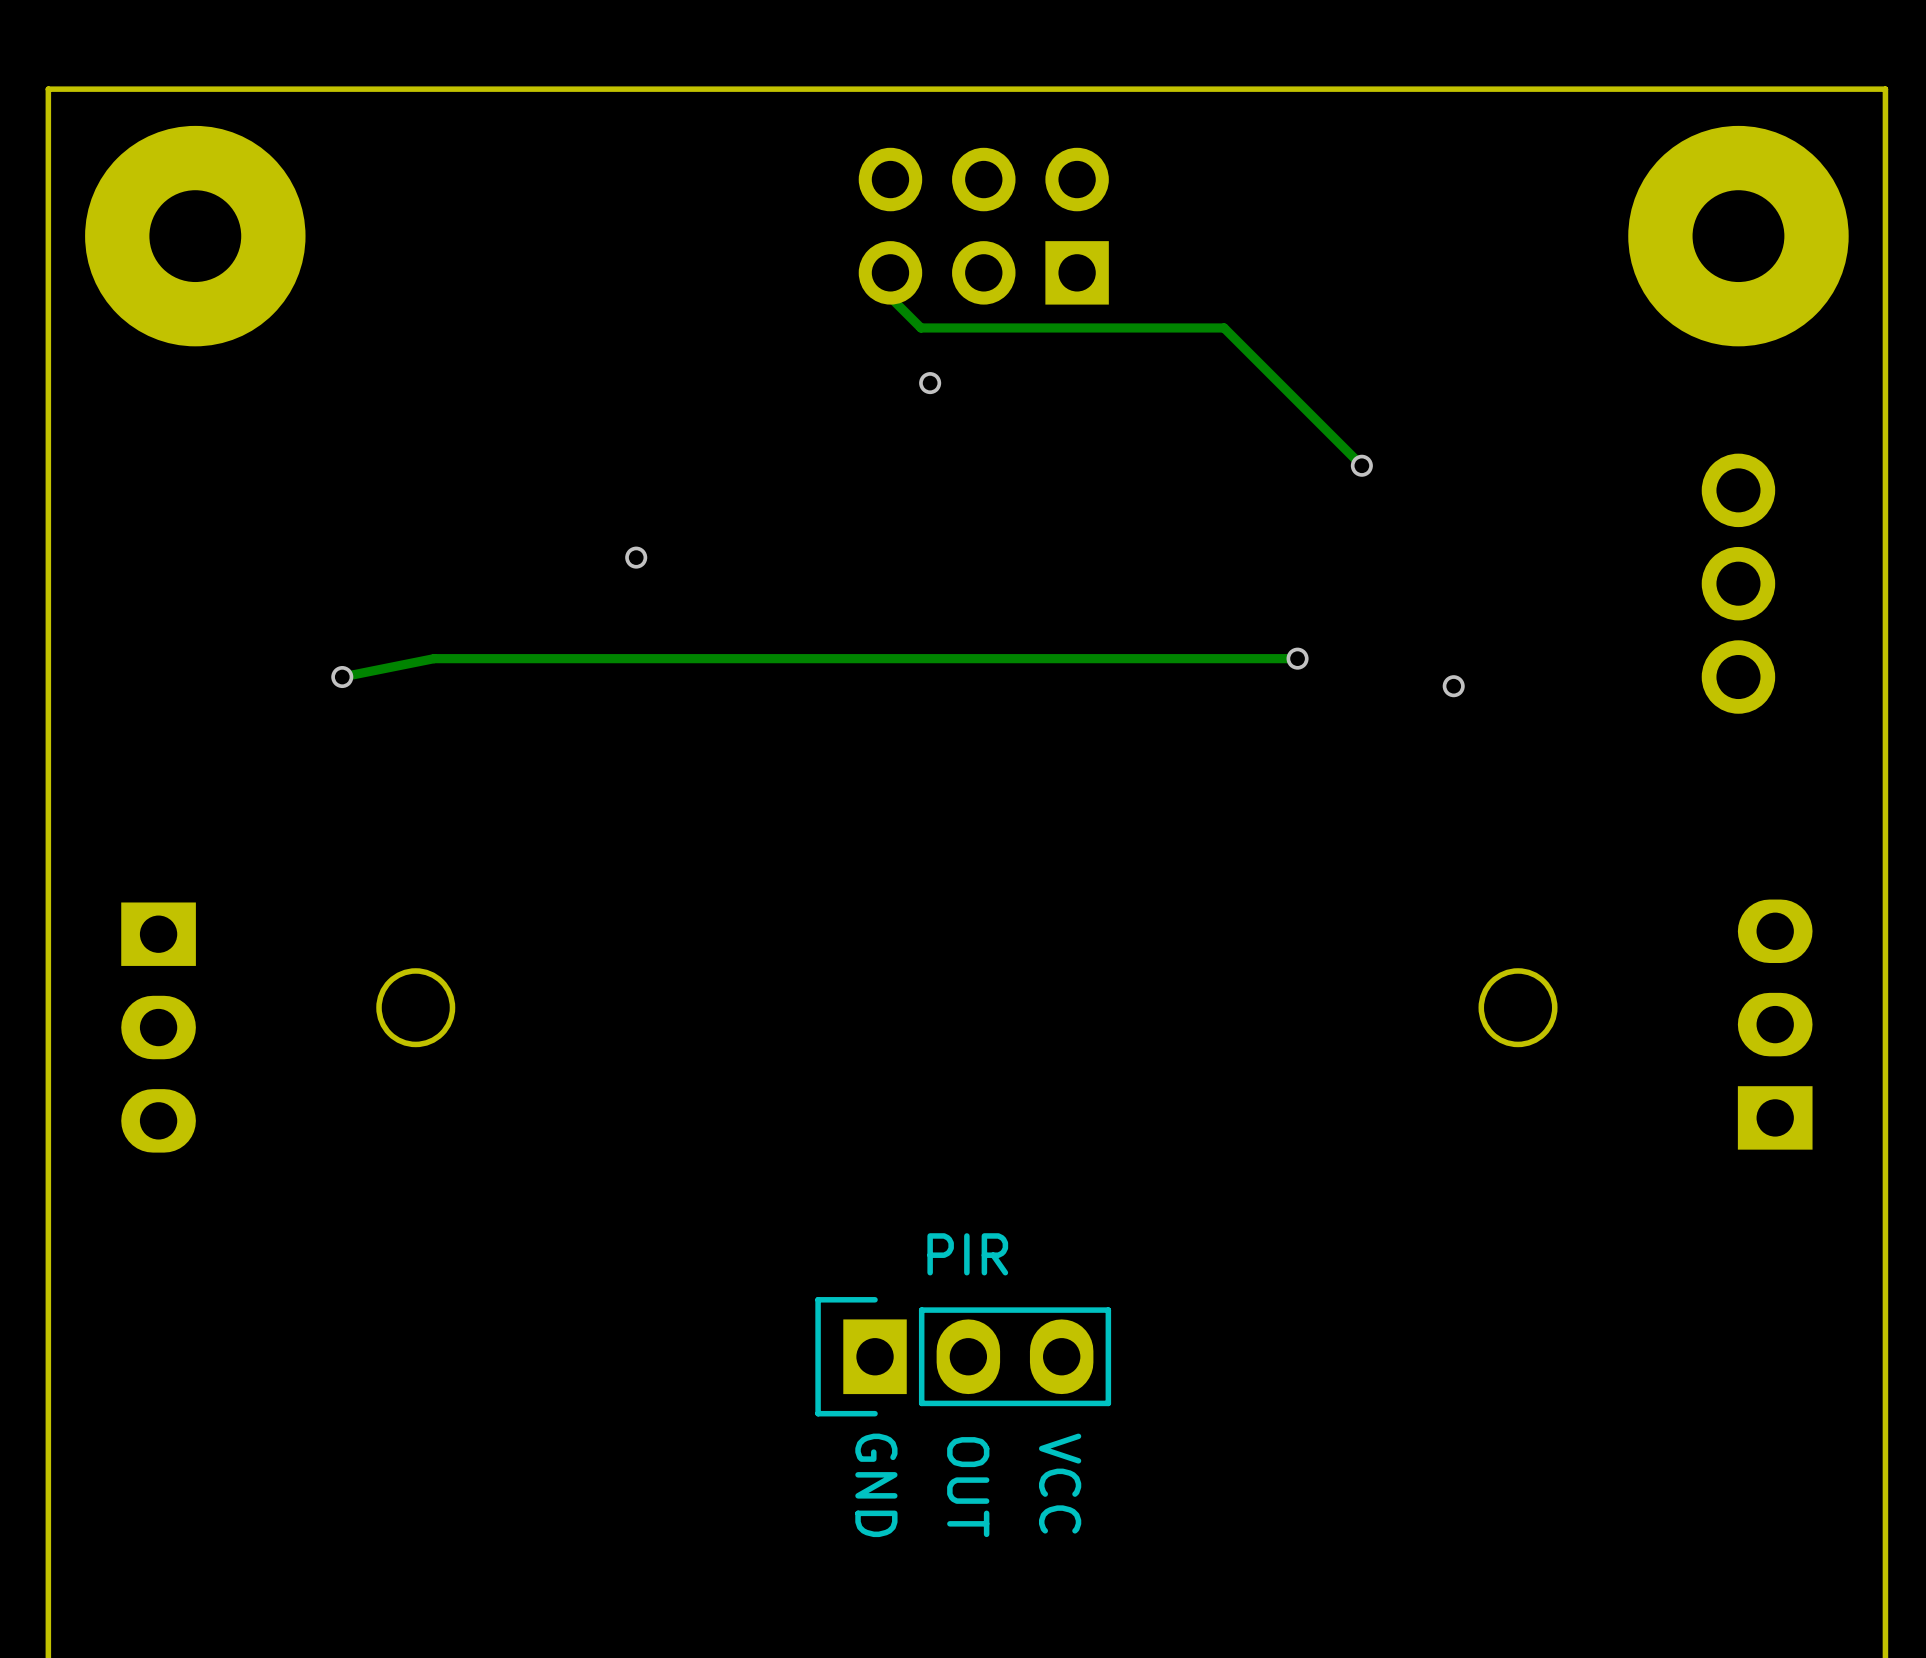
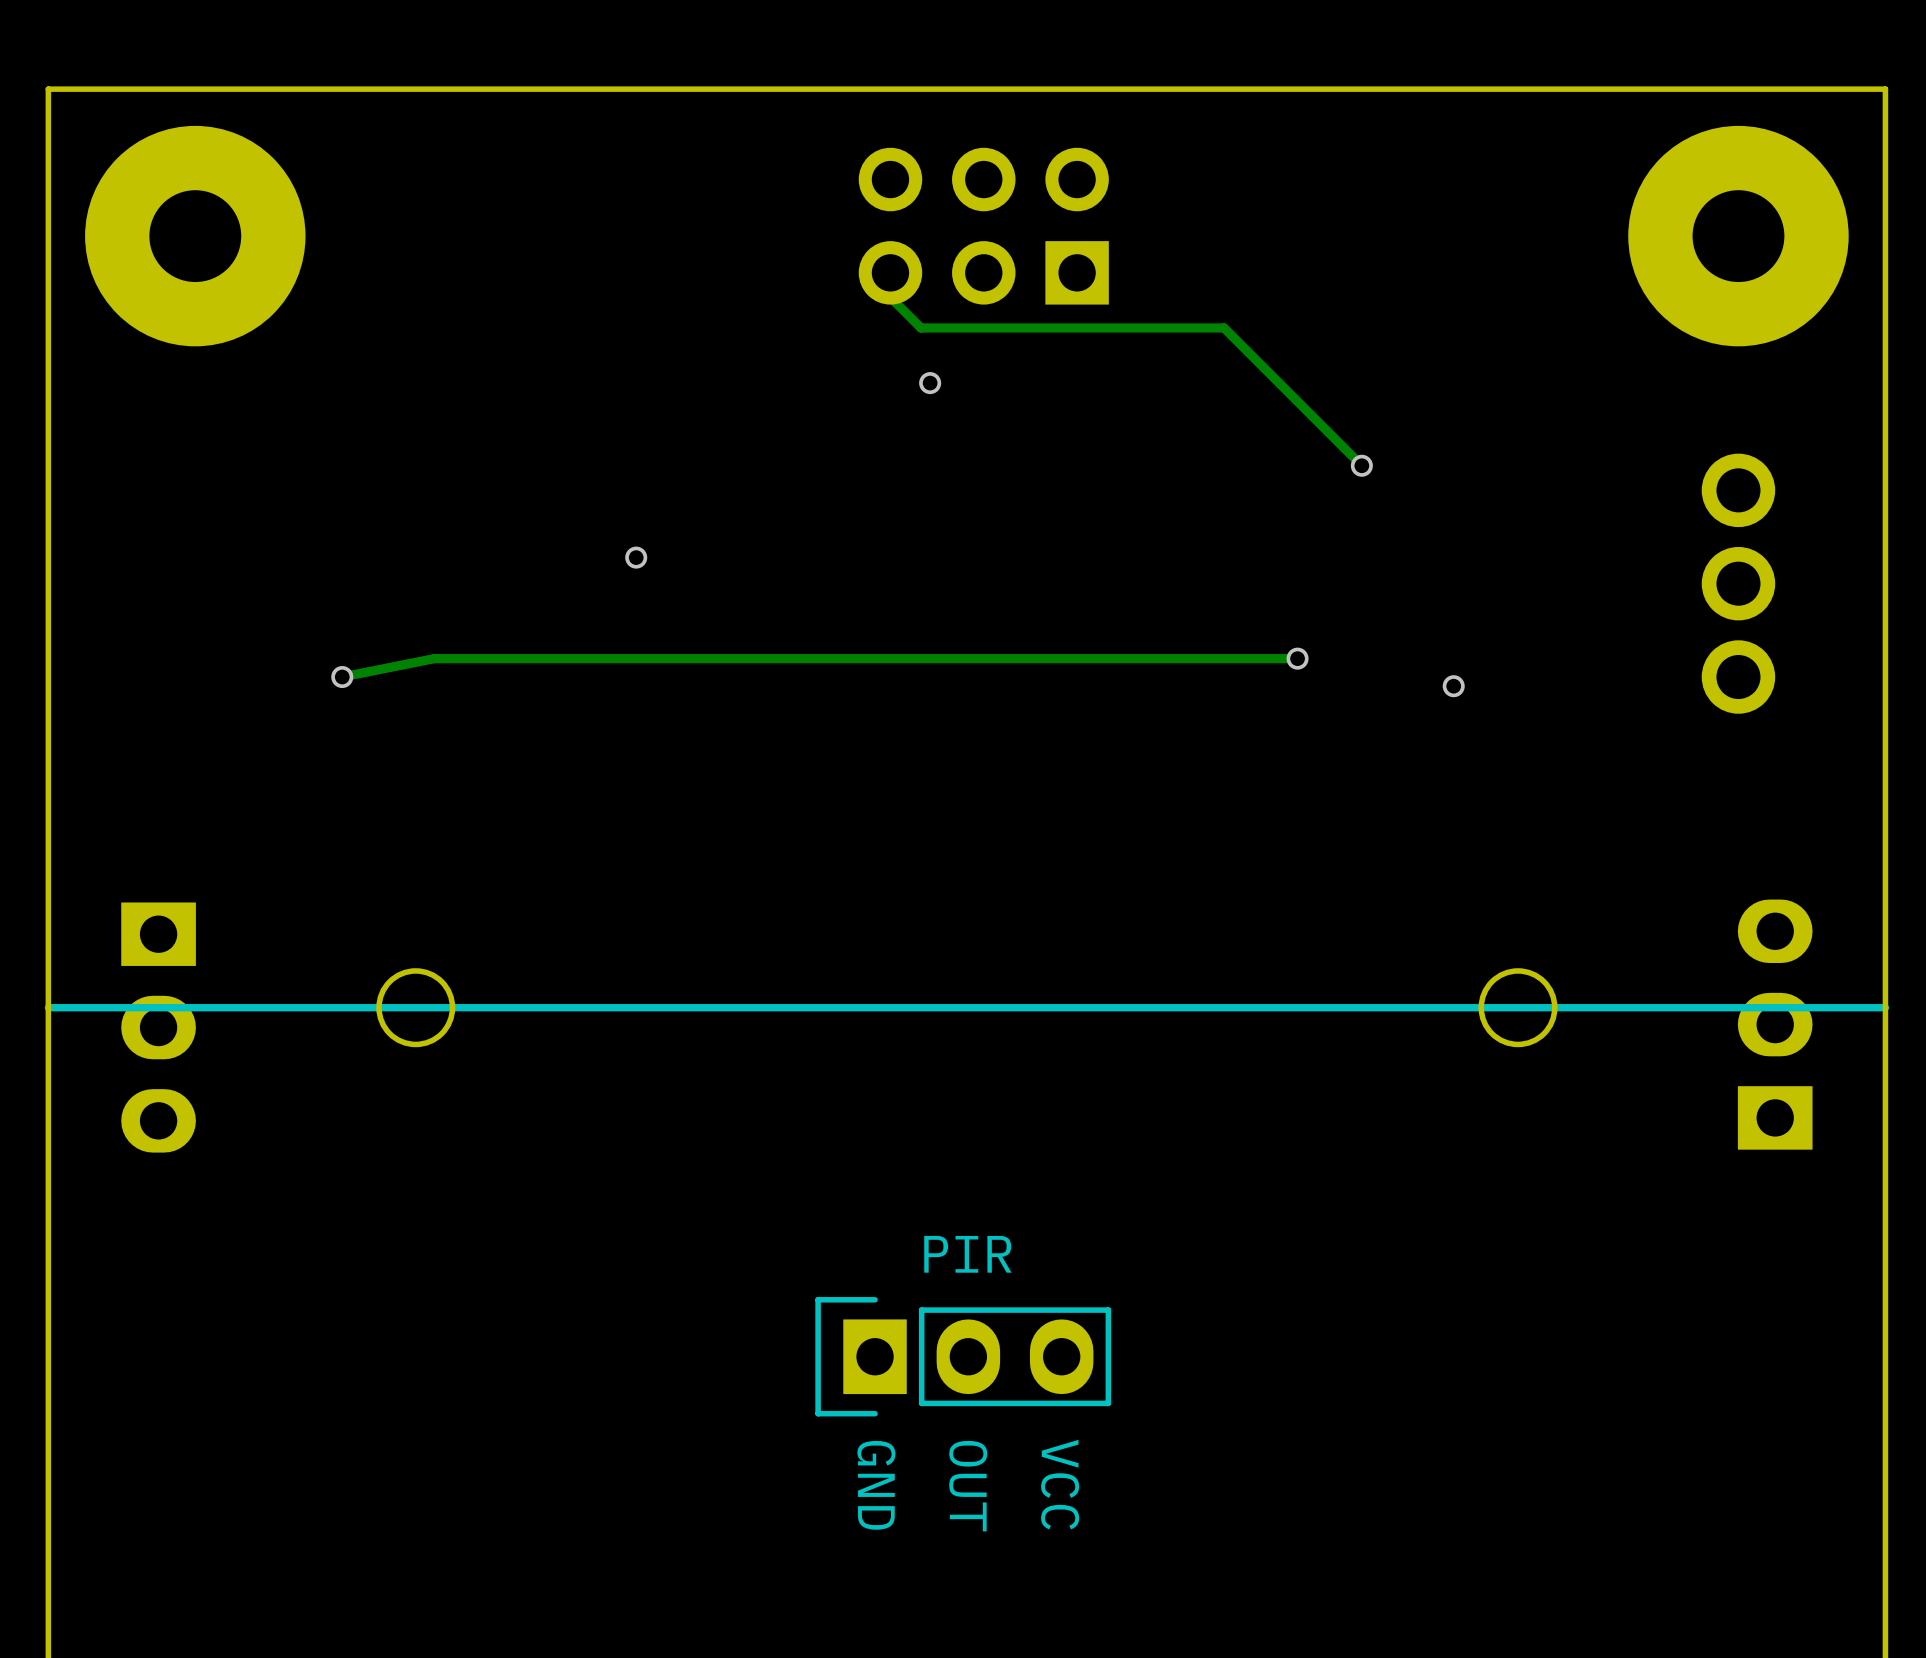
line: none -> (1885, 1007) (48, 1007)

